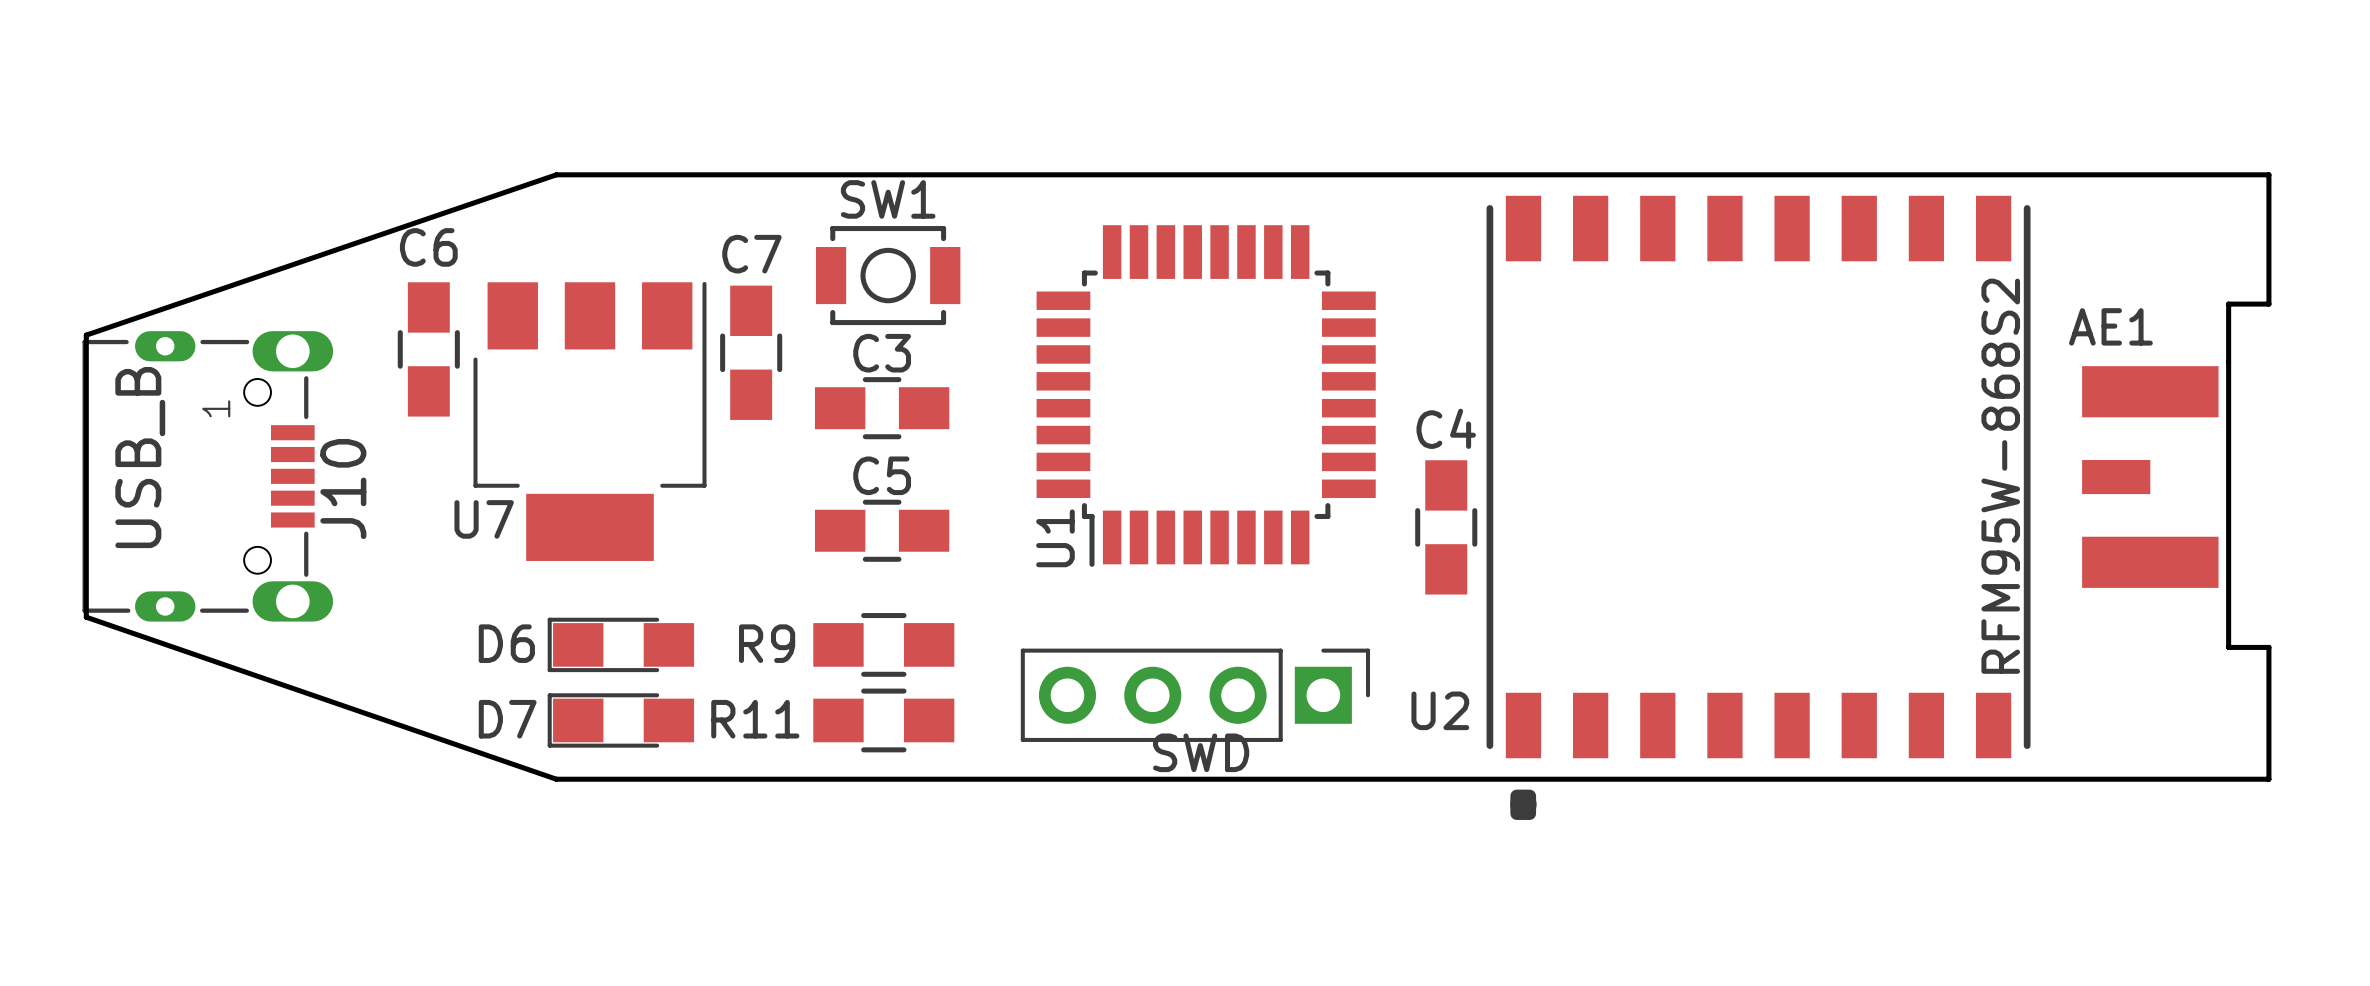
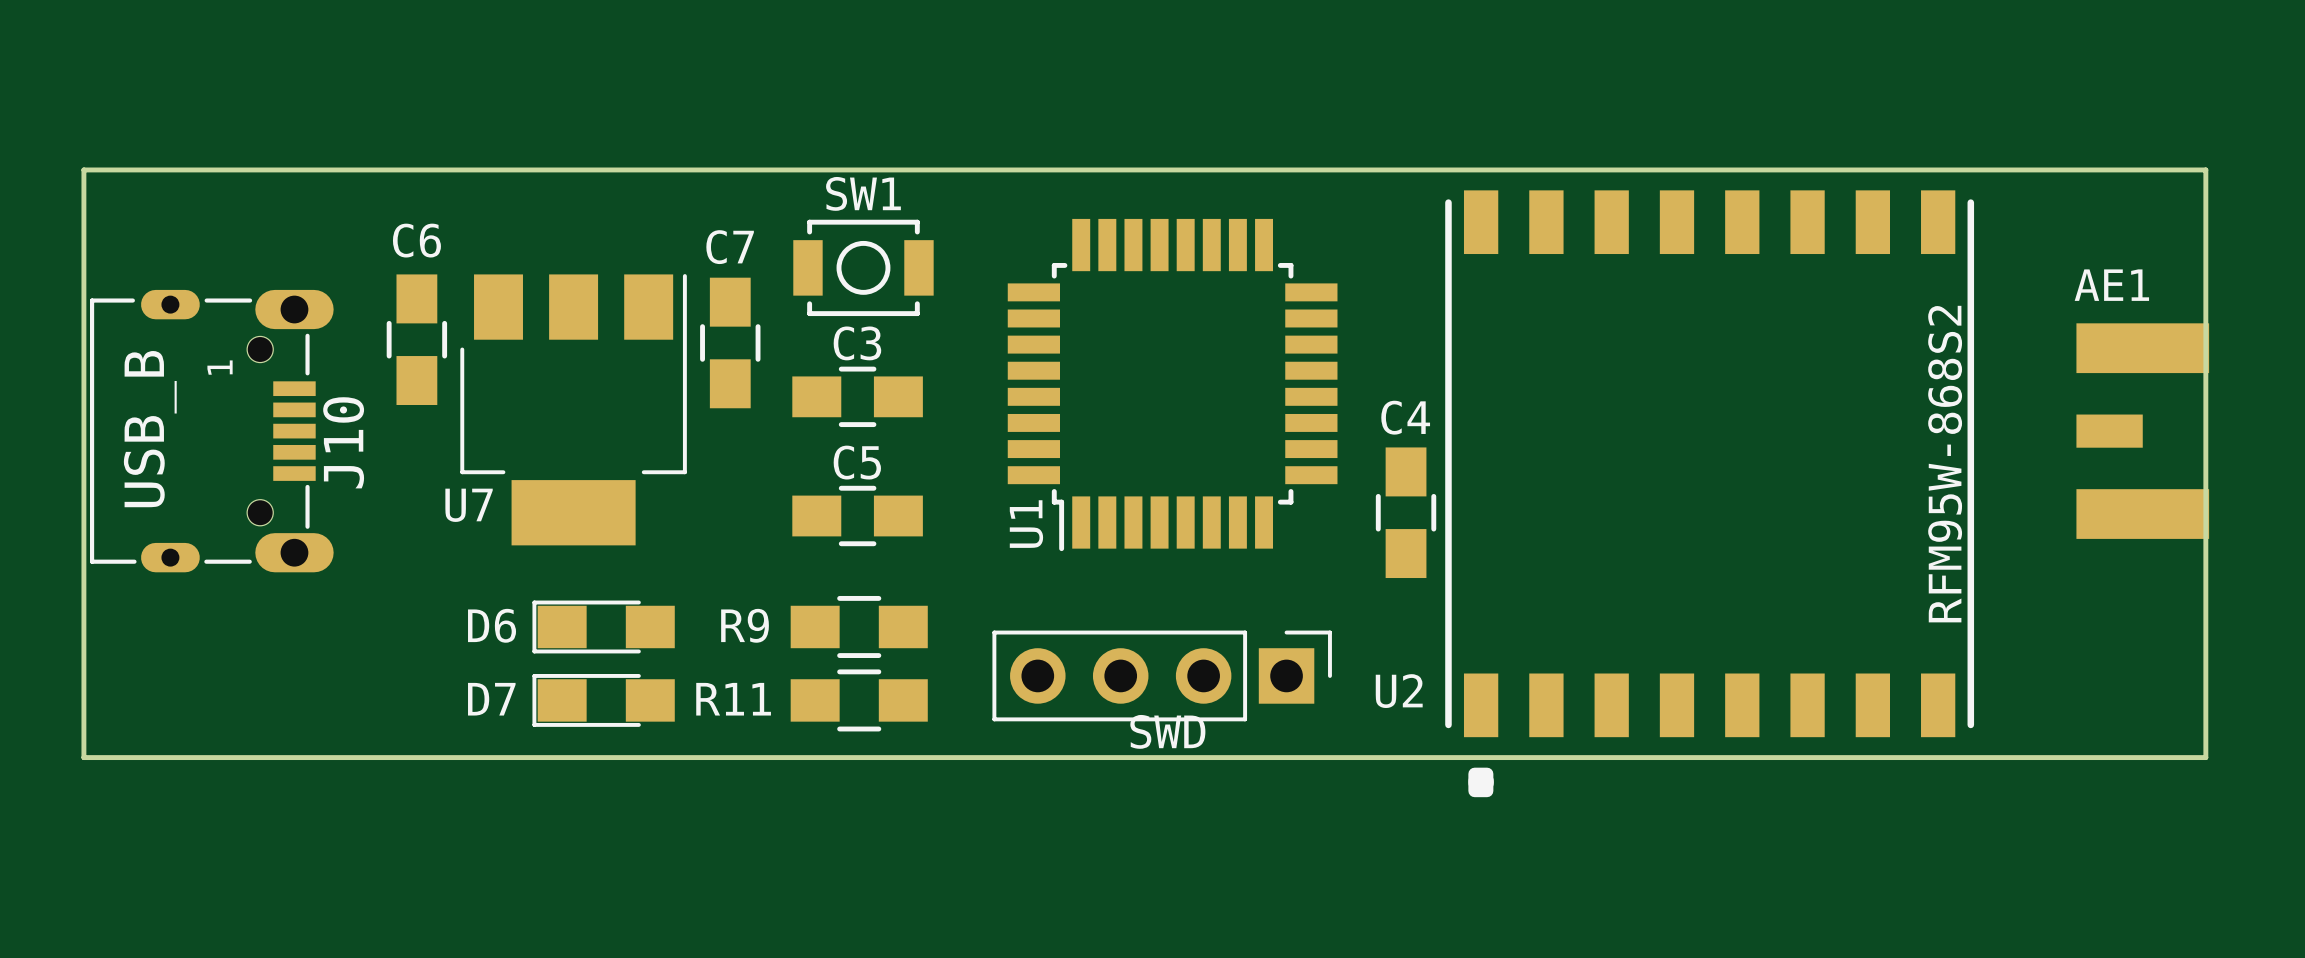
board edge: (556, 174) (86, 335) -> (540, 169) (83, 169) (83, 325)
board edge: (2268, 304) (2228, 304) (2228, 647) (2268, 647) -> (2205, 295) (2205, 629)
J10 footprint: [82, 331, 334, 622] -> [90, 289, 334, 573]
AE1 position: (2150, 477) -> (2142, 431)
board edge: (86, 617) (556, 779) -> (83, 600) (83, 757) (540, 757)

